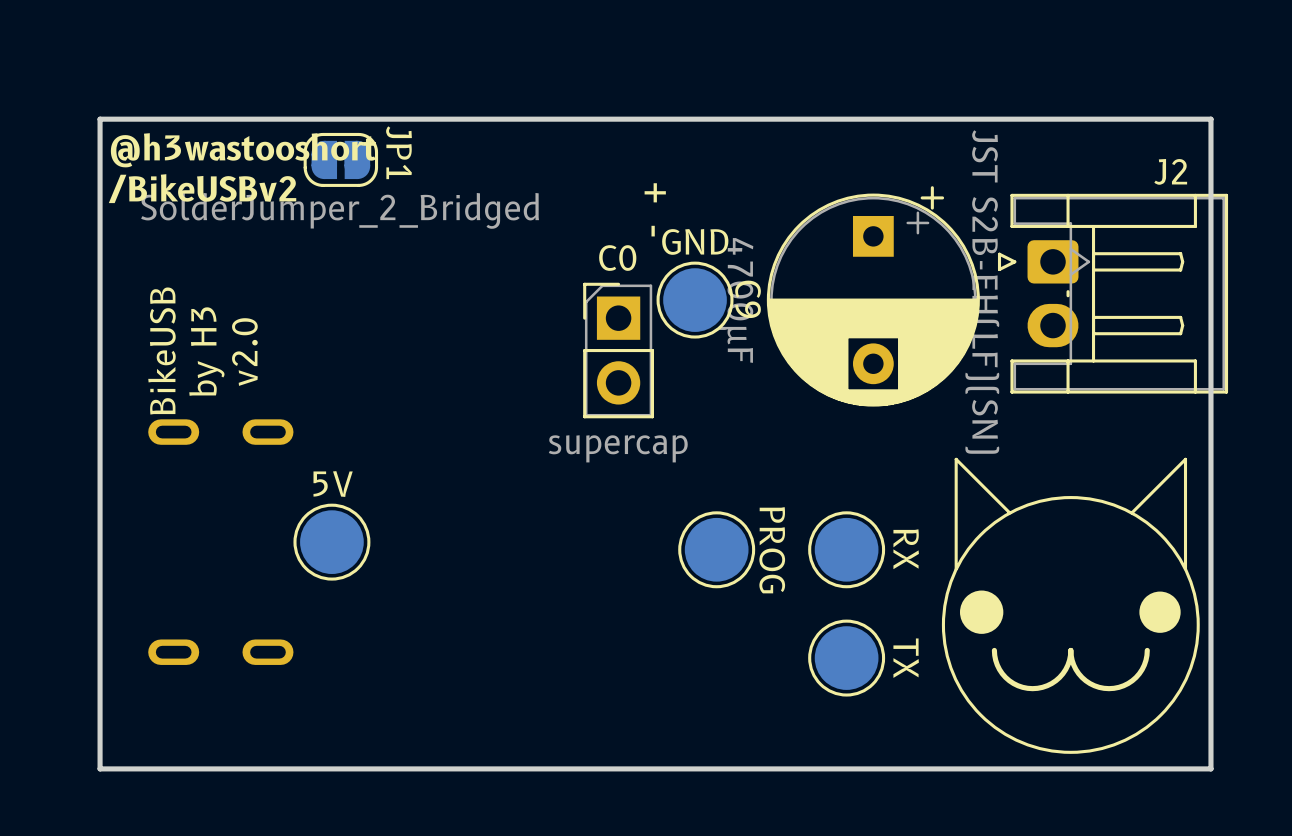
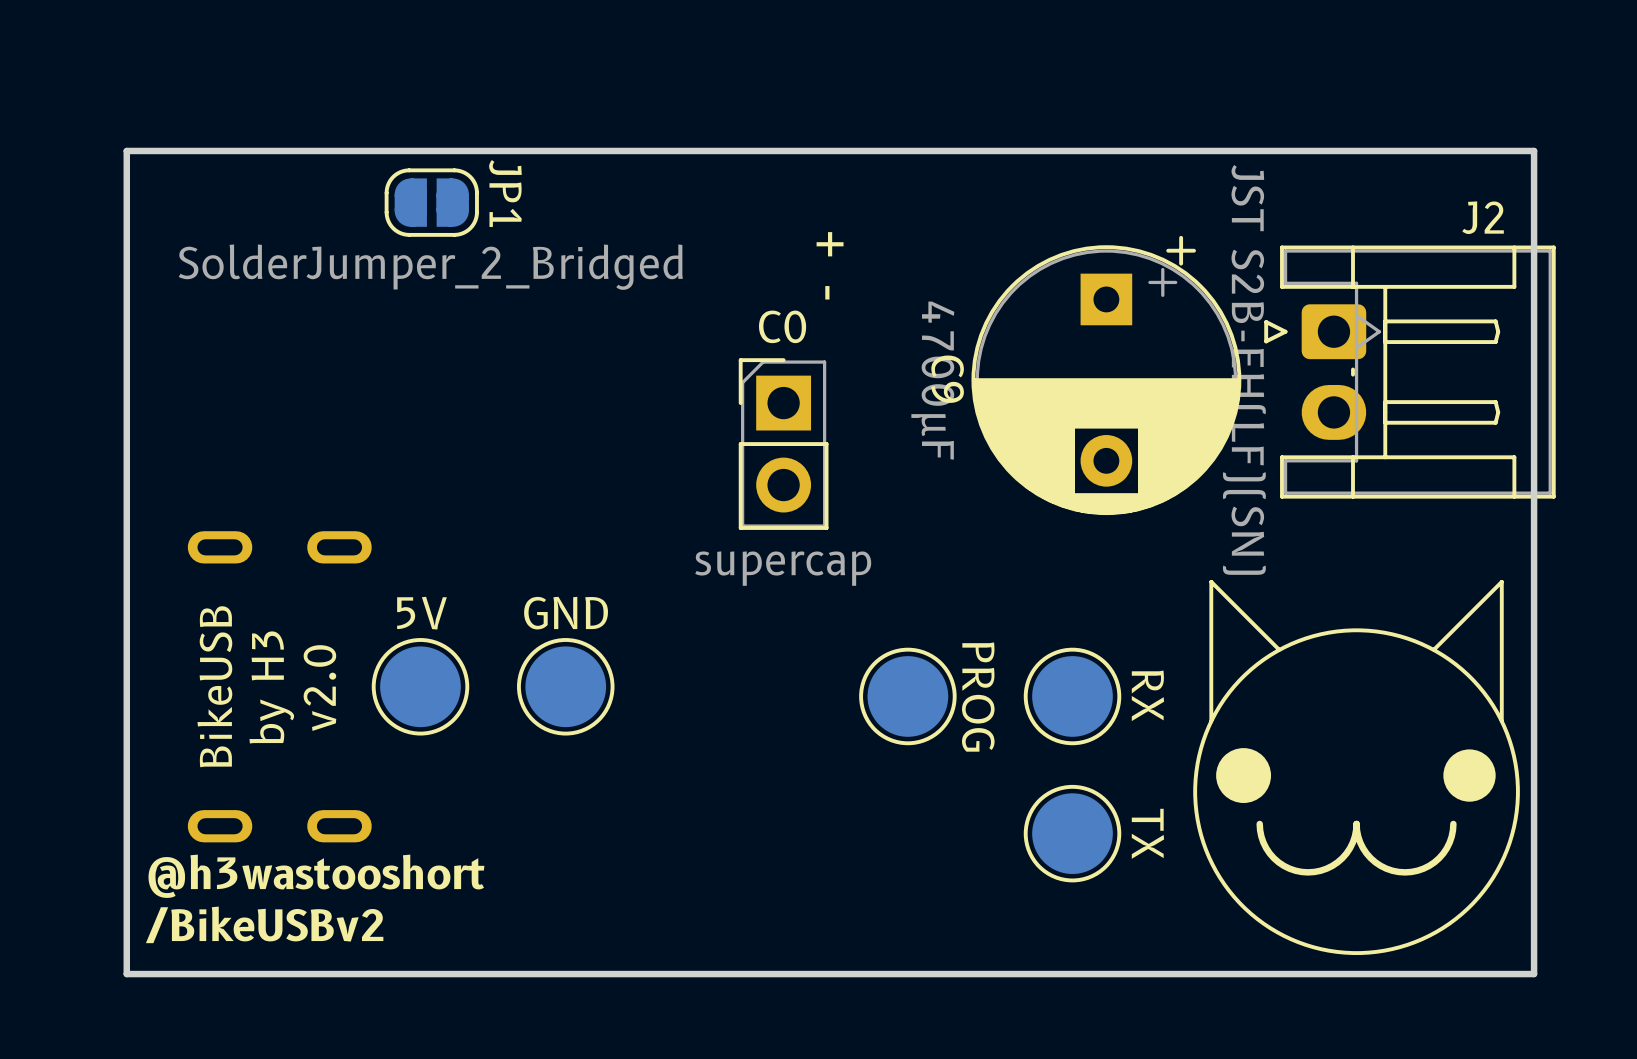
text position: @h3wastooshort (243, 150) -> @h3wastooshort (316, 876)
text position: /BikeUSBv2 (202, 188) -> /BikeUSBv2 (264, 924)
part position: (695, 300) -> (565, 686)
text position: BikeUSB (161, 351) -> BikeUSB (214, 686)
text position: by H3 (206, 351) -> by H3 (271, 687)
text position: v2.0 (244, 352) -> v2.0 (319, 688)

